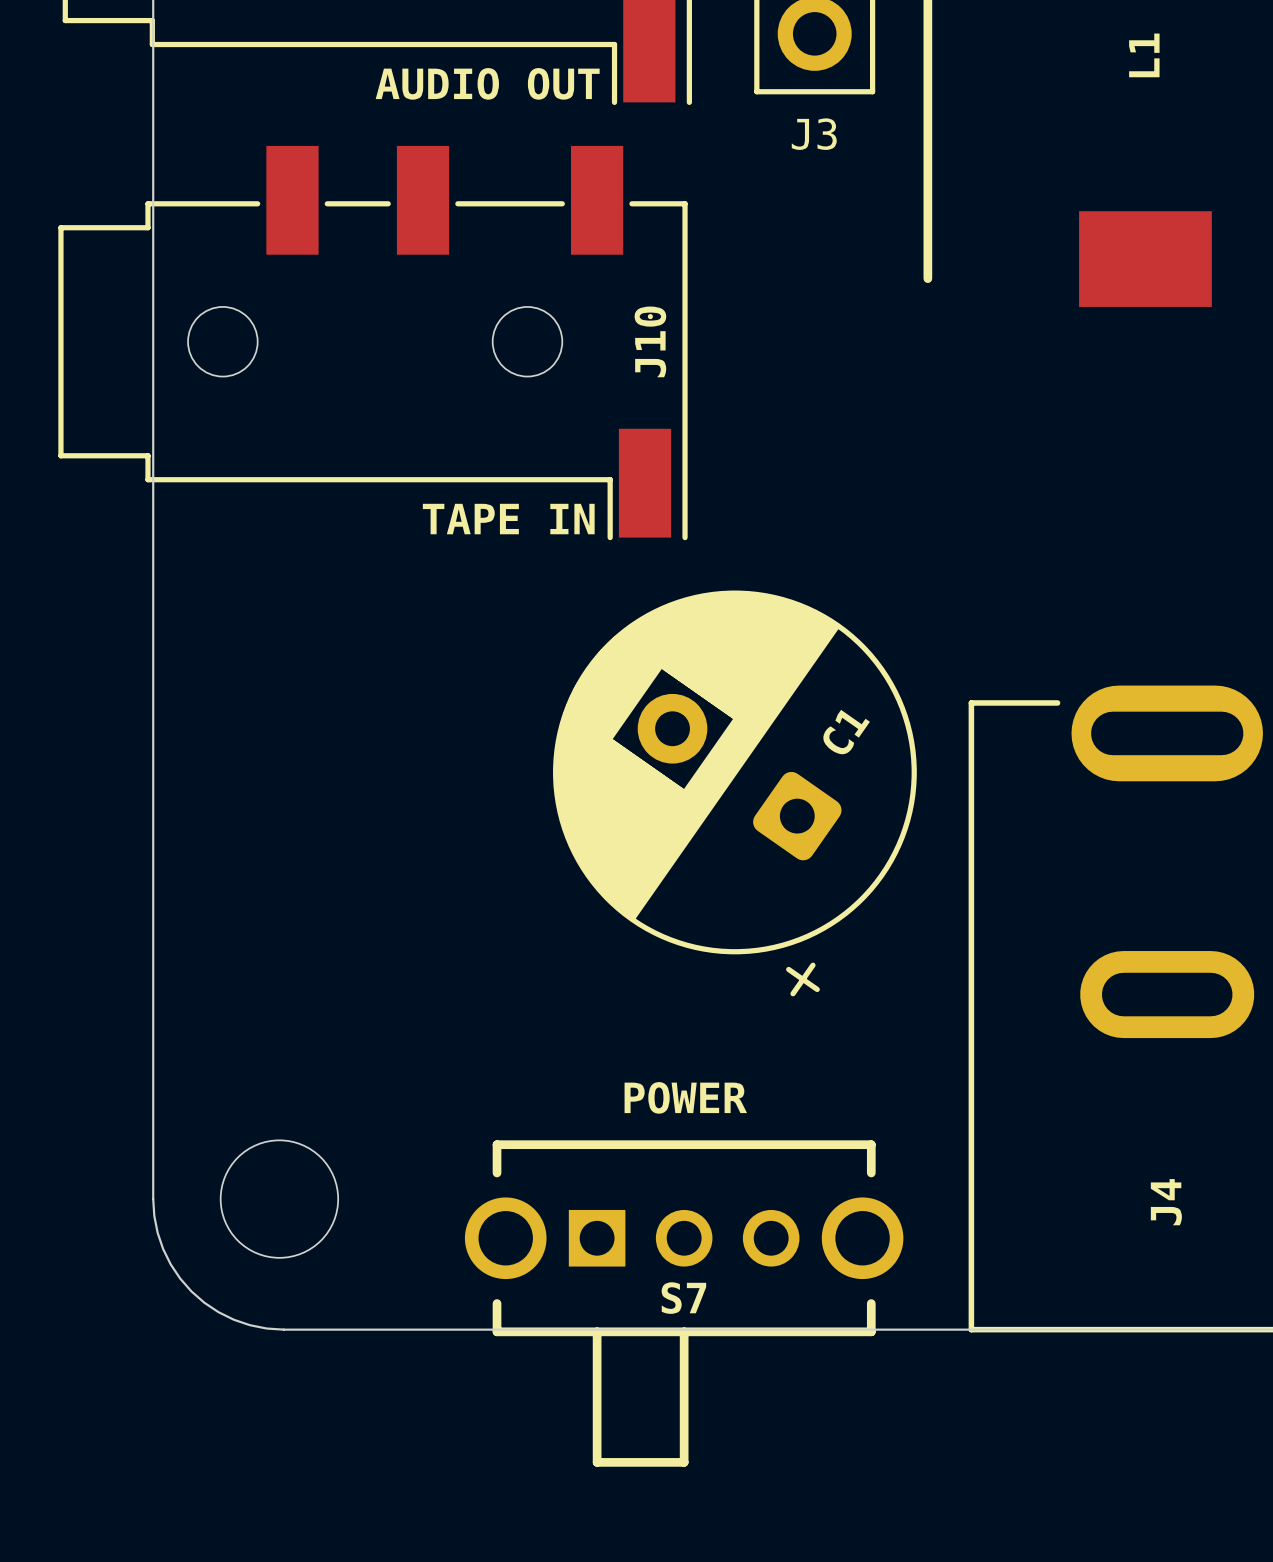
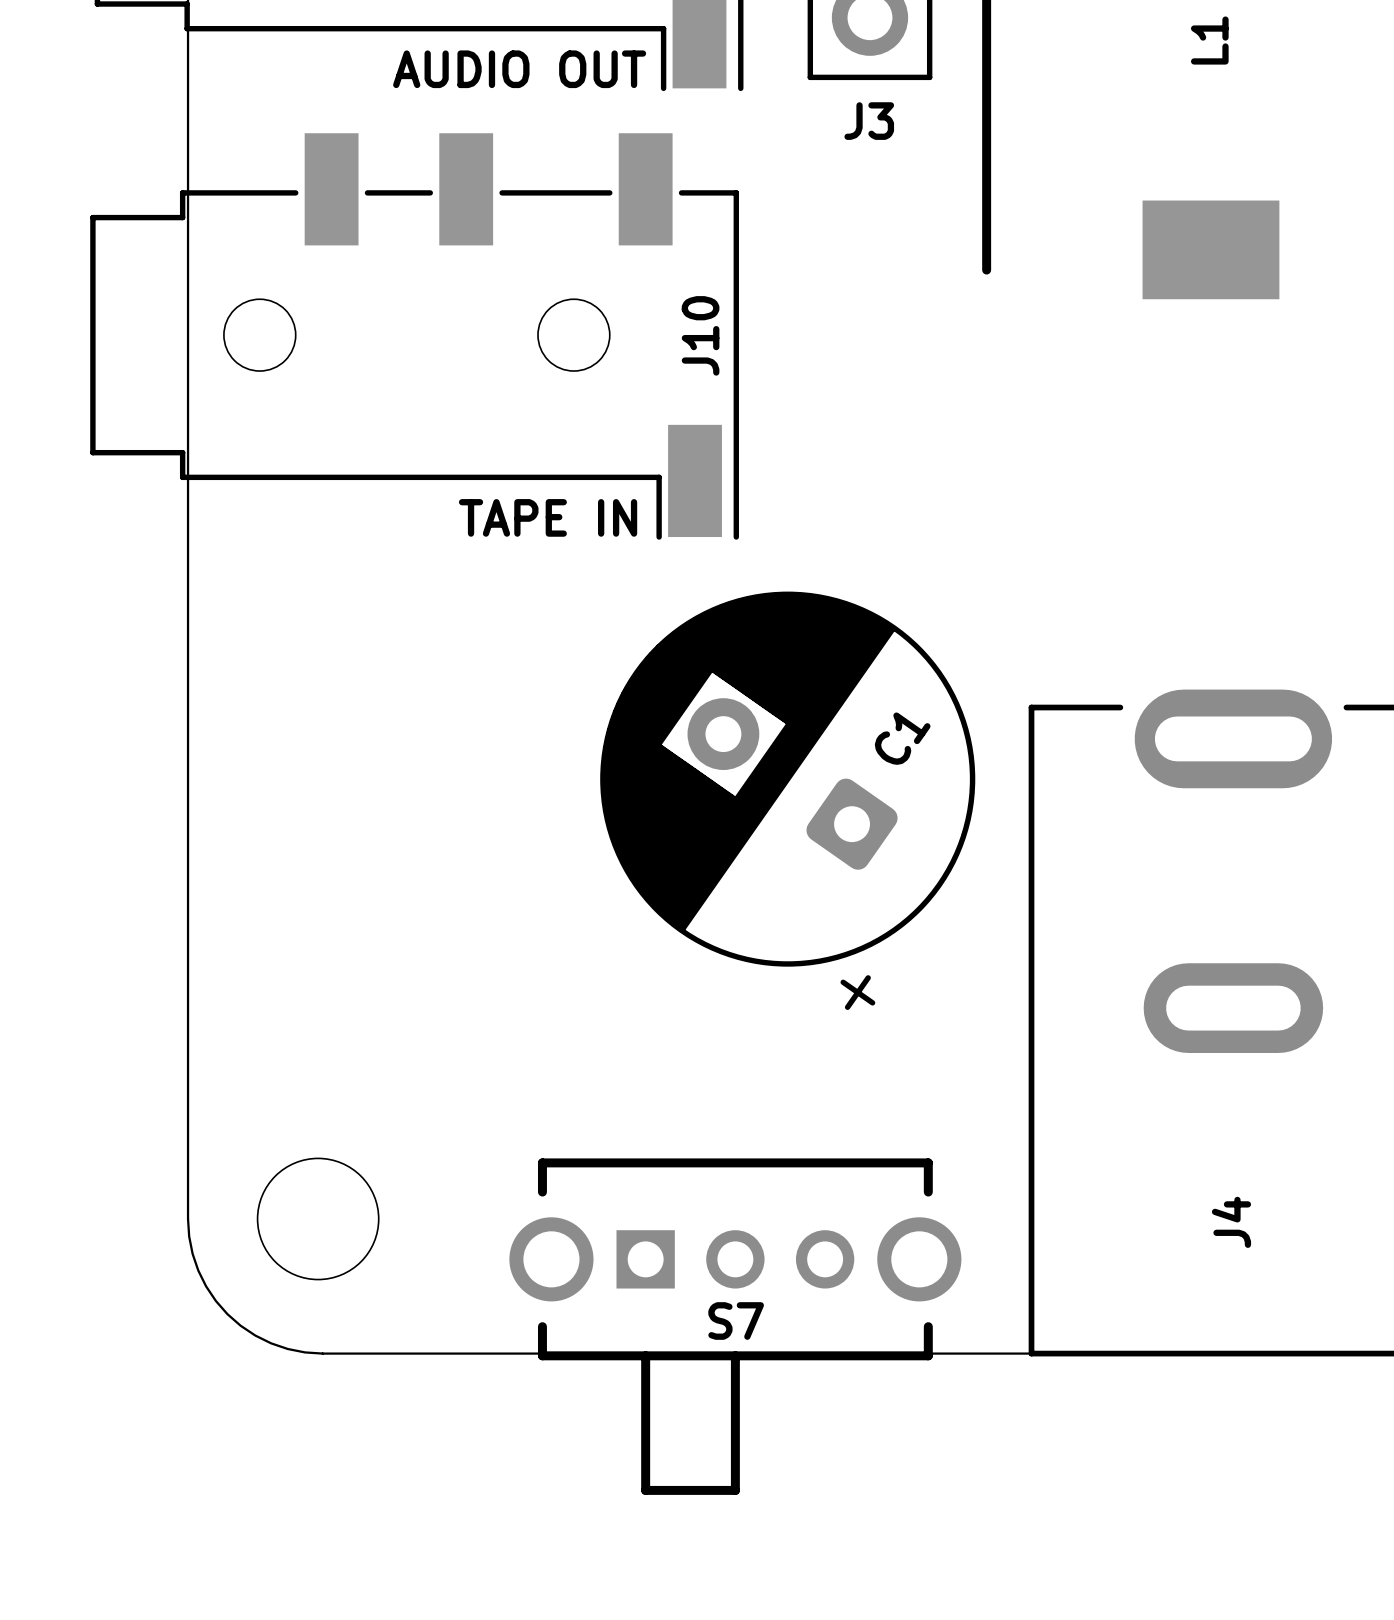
text: POWER (685, 1097) -> none

